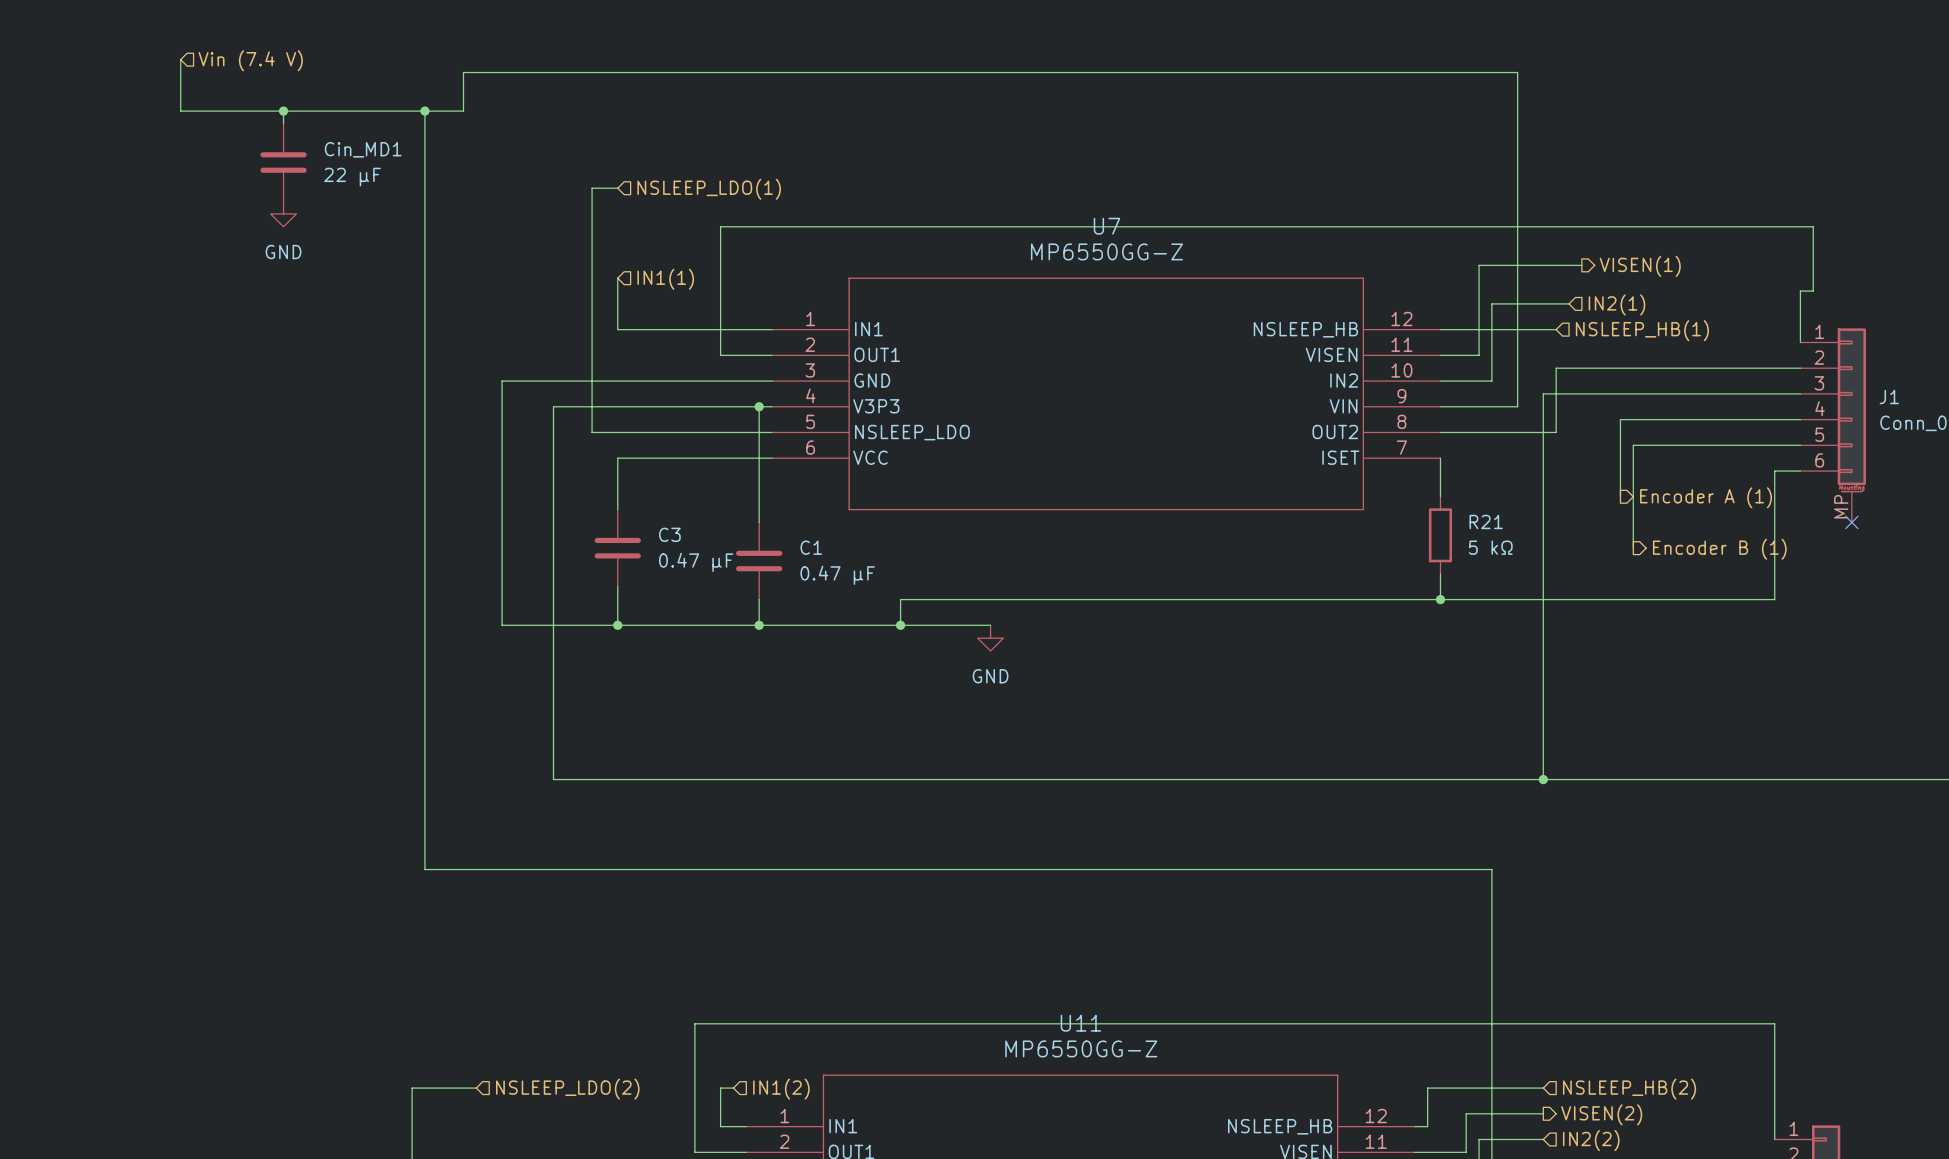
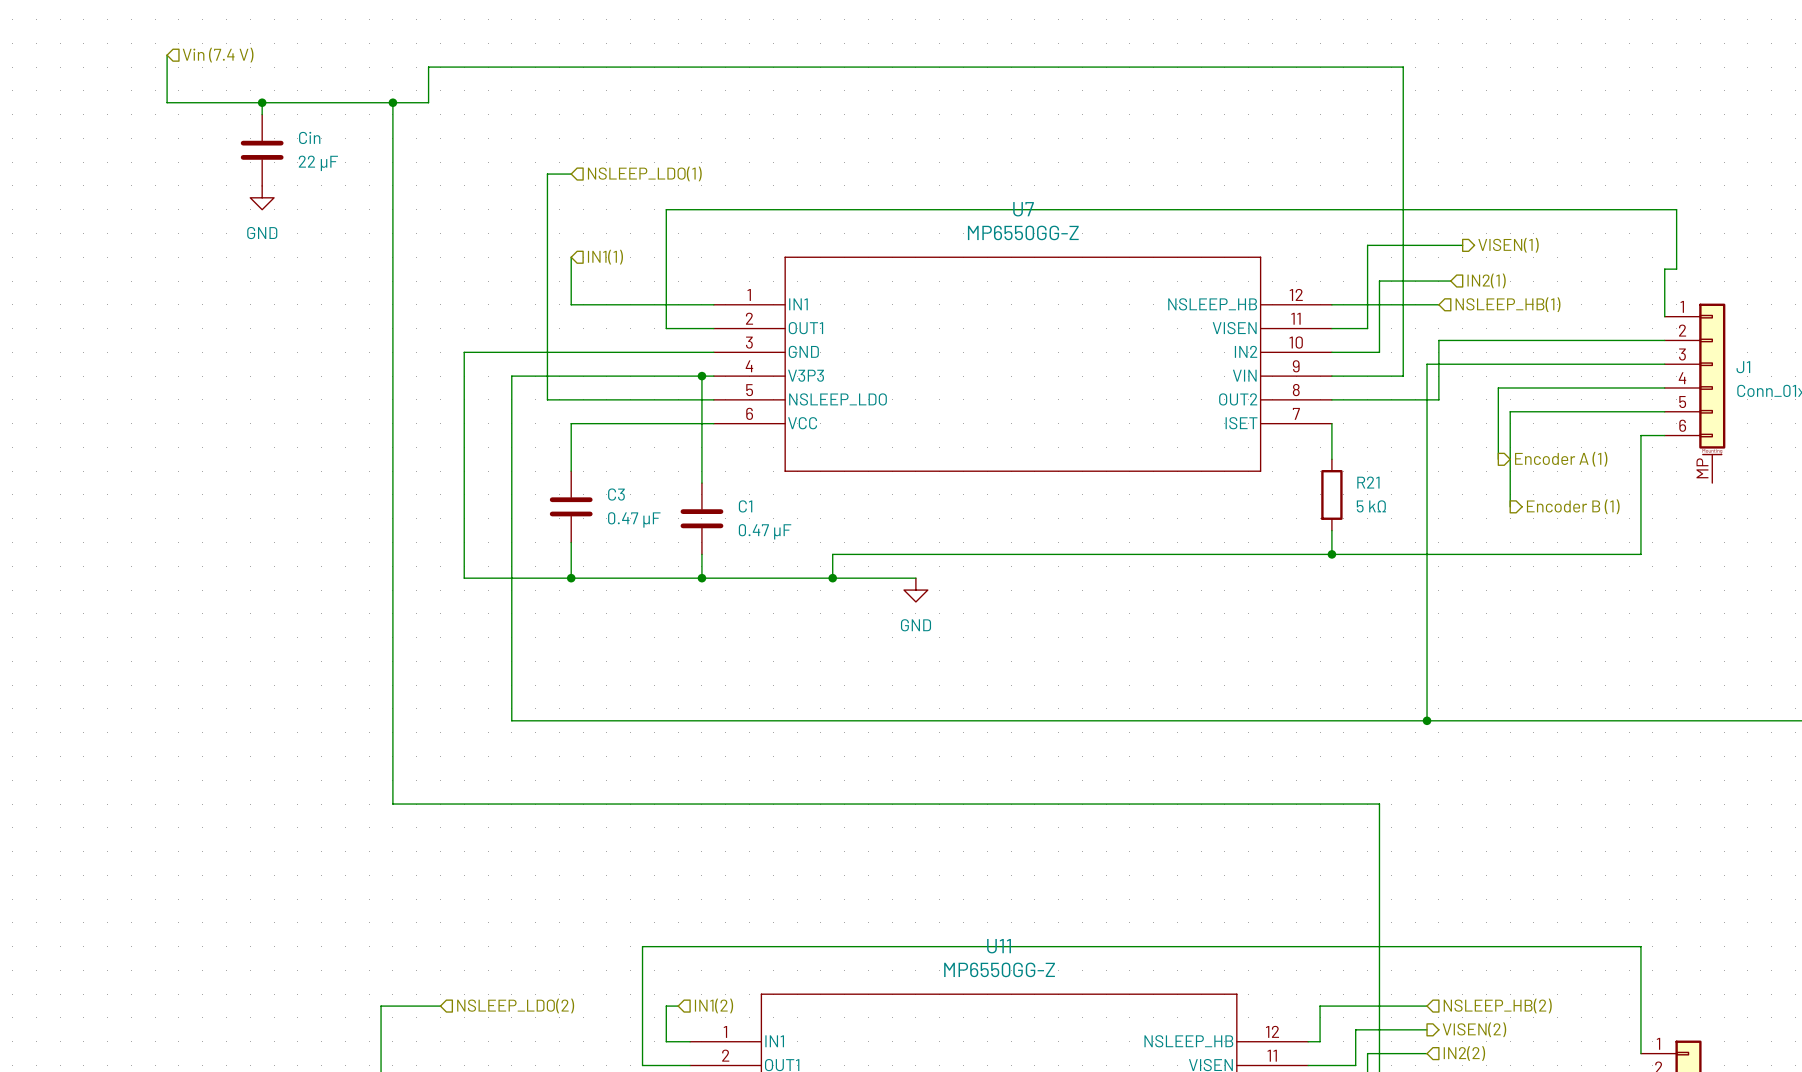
Cin_MD1 name: Cin_MD1 (363, 149) -> Cin (309, 137)
no-connect mark: (1851, 522) -> none

